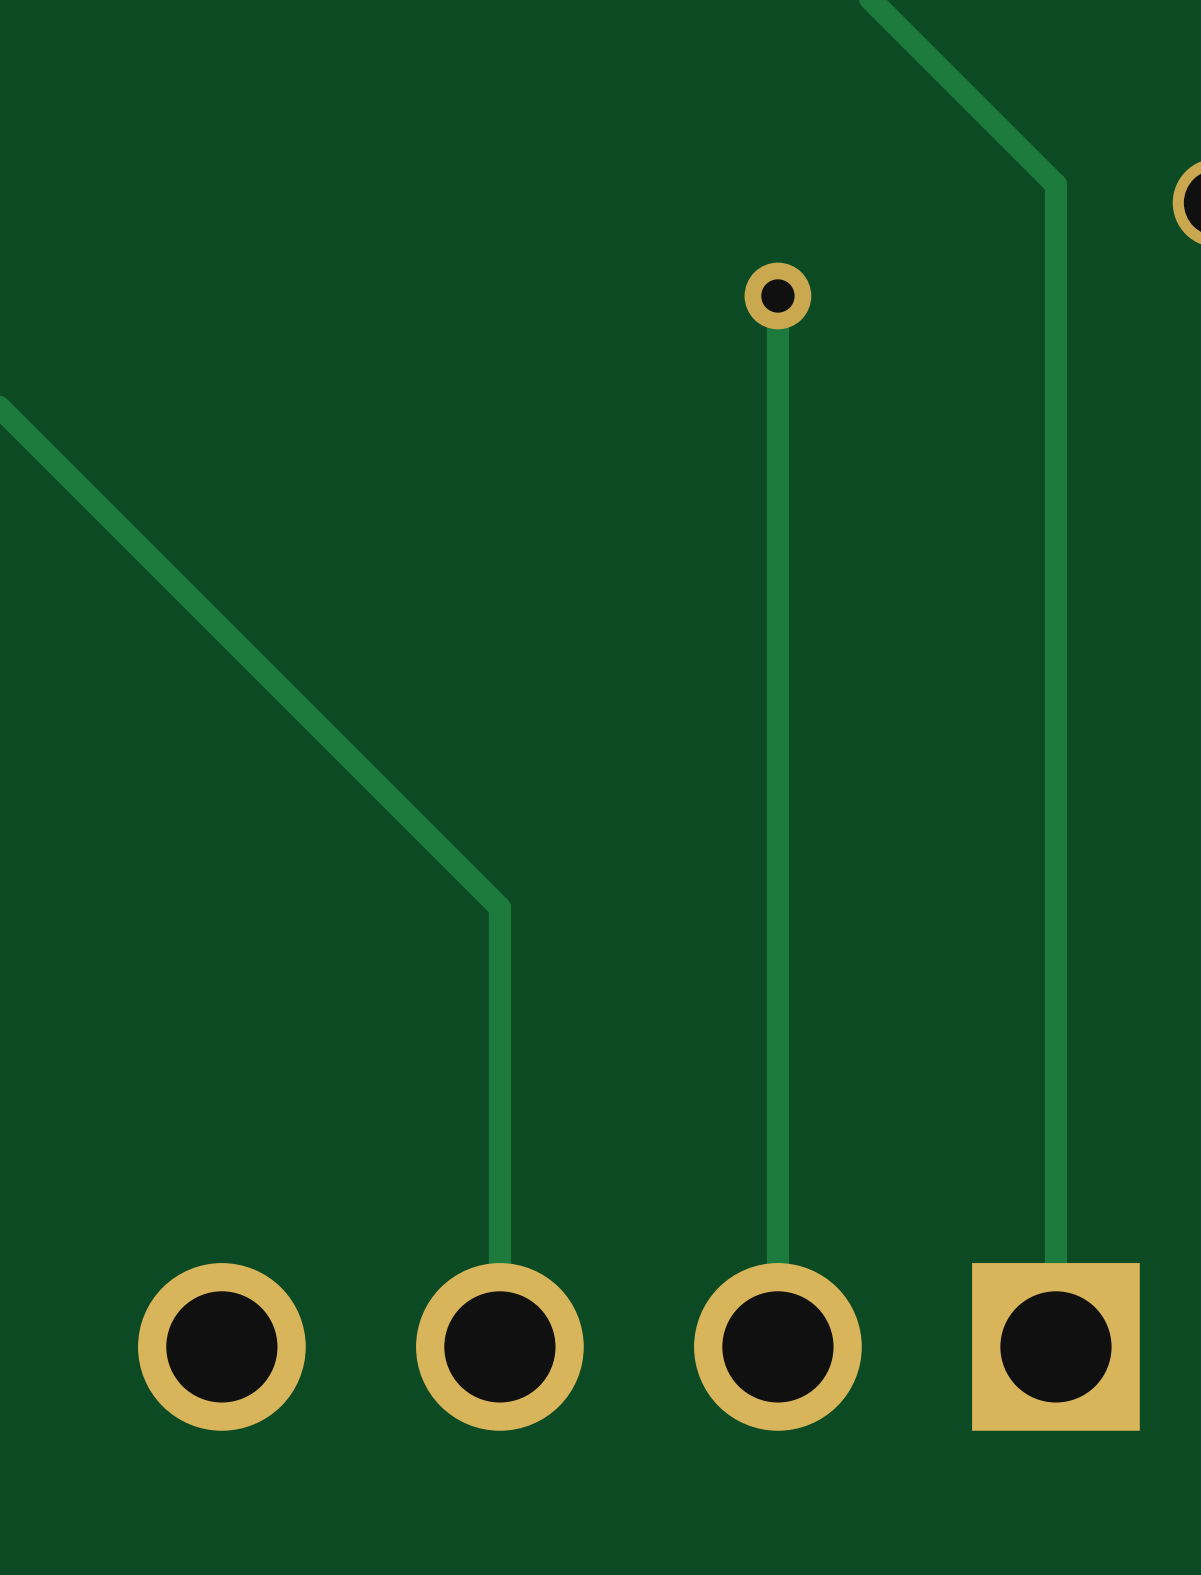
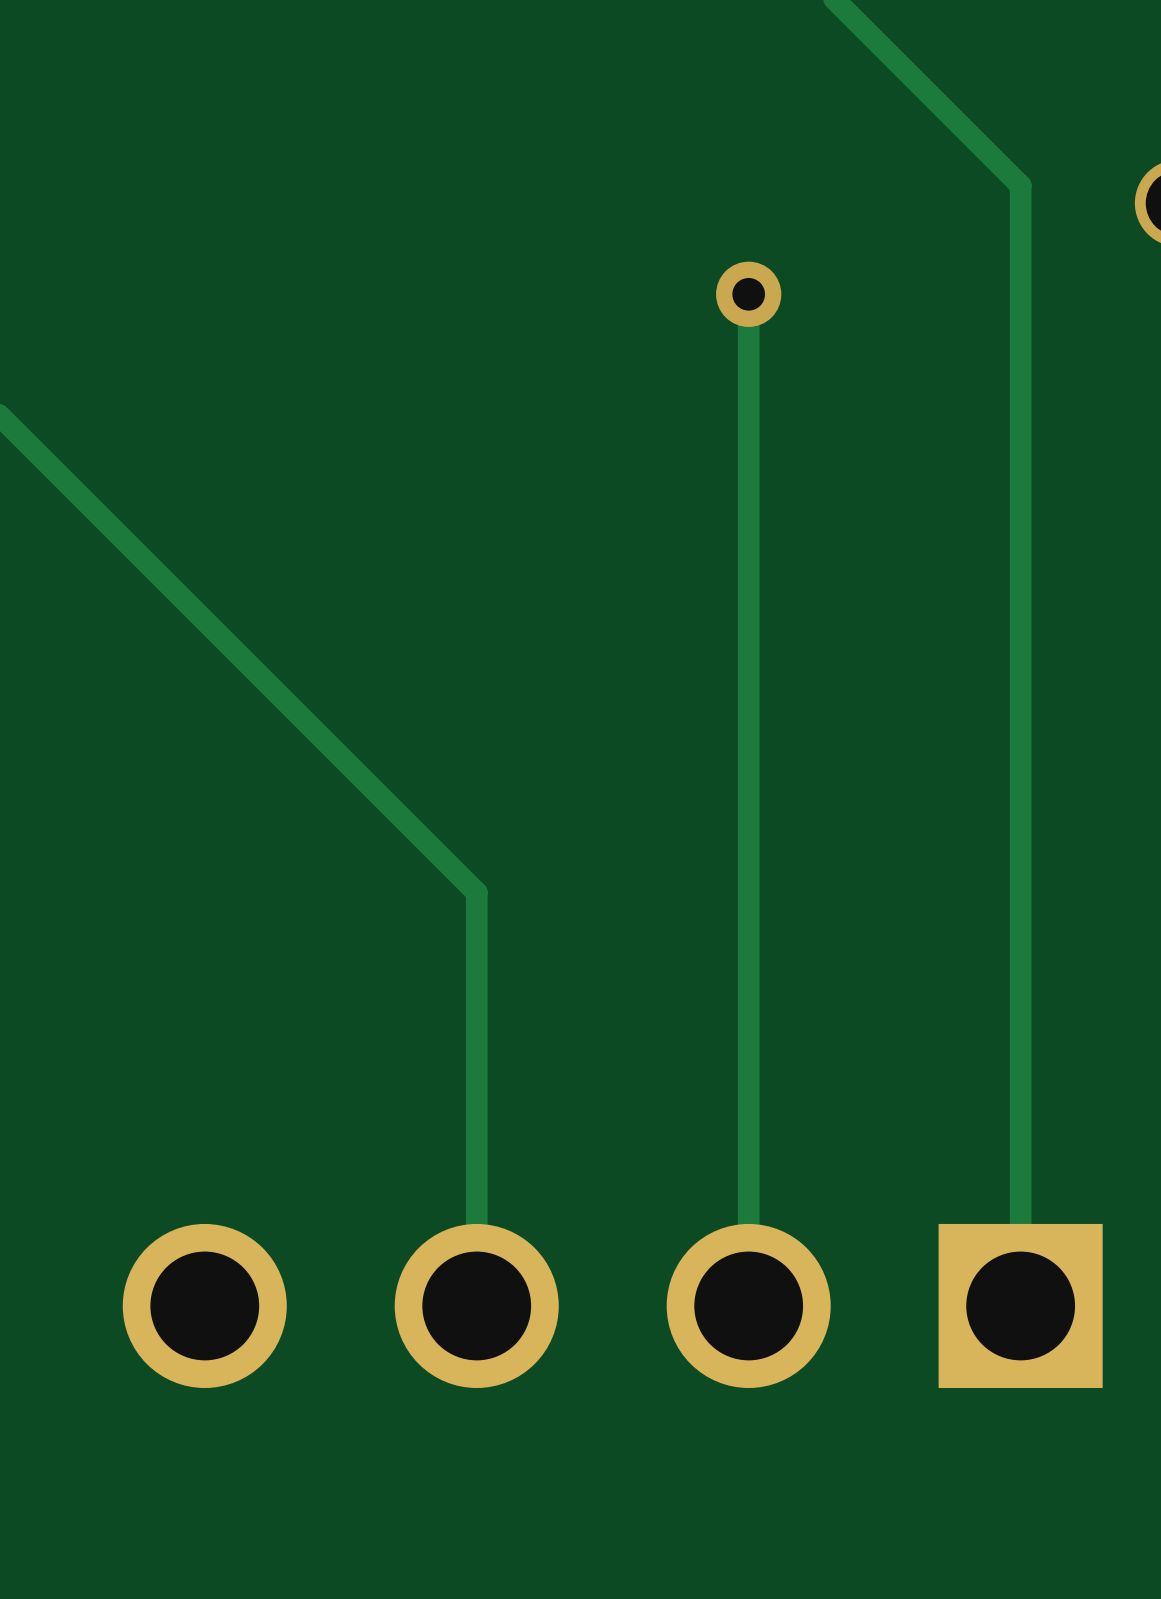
part position: (638, 1346) -> (612, 1305)

